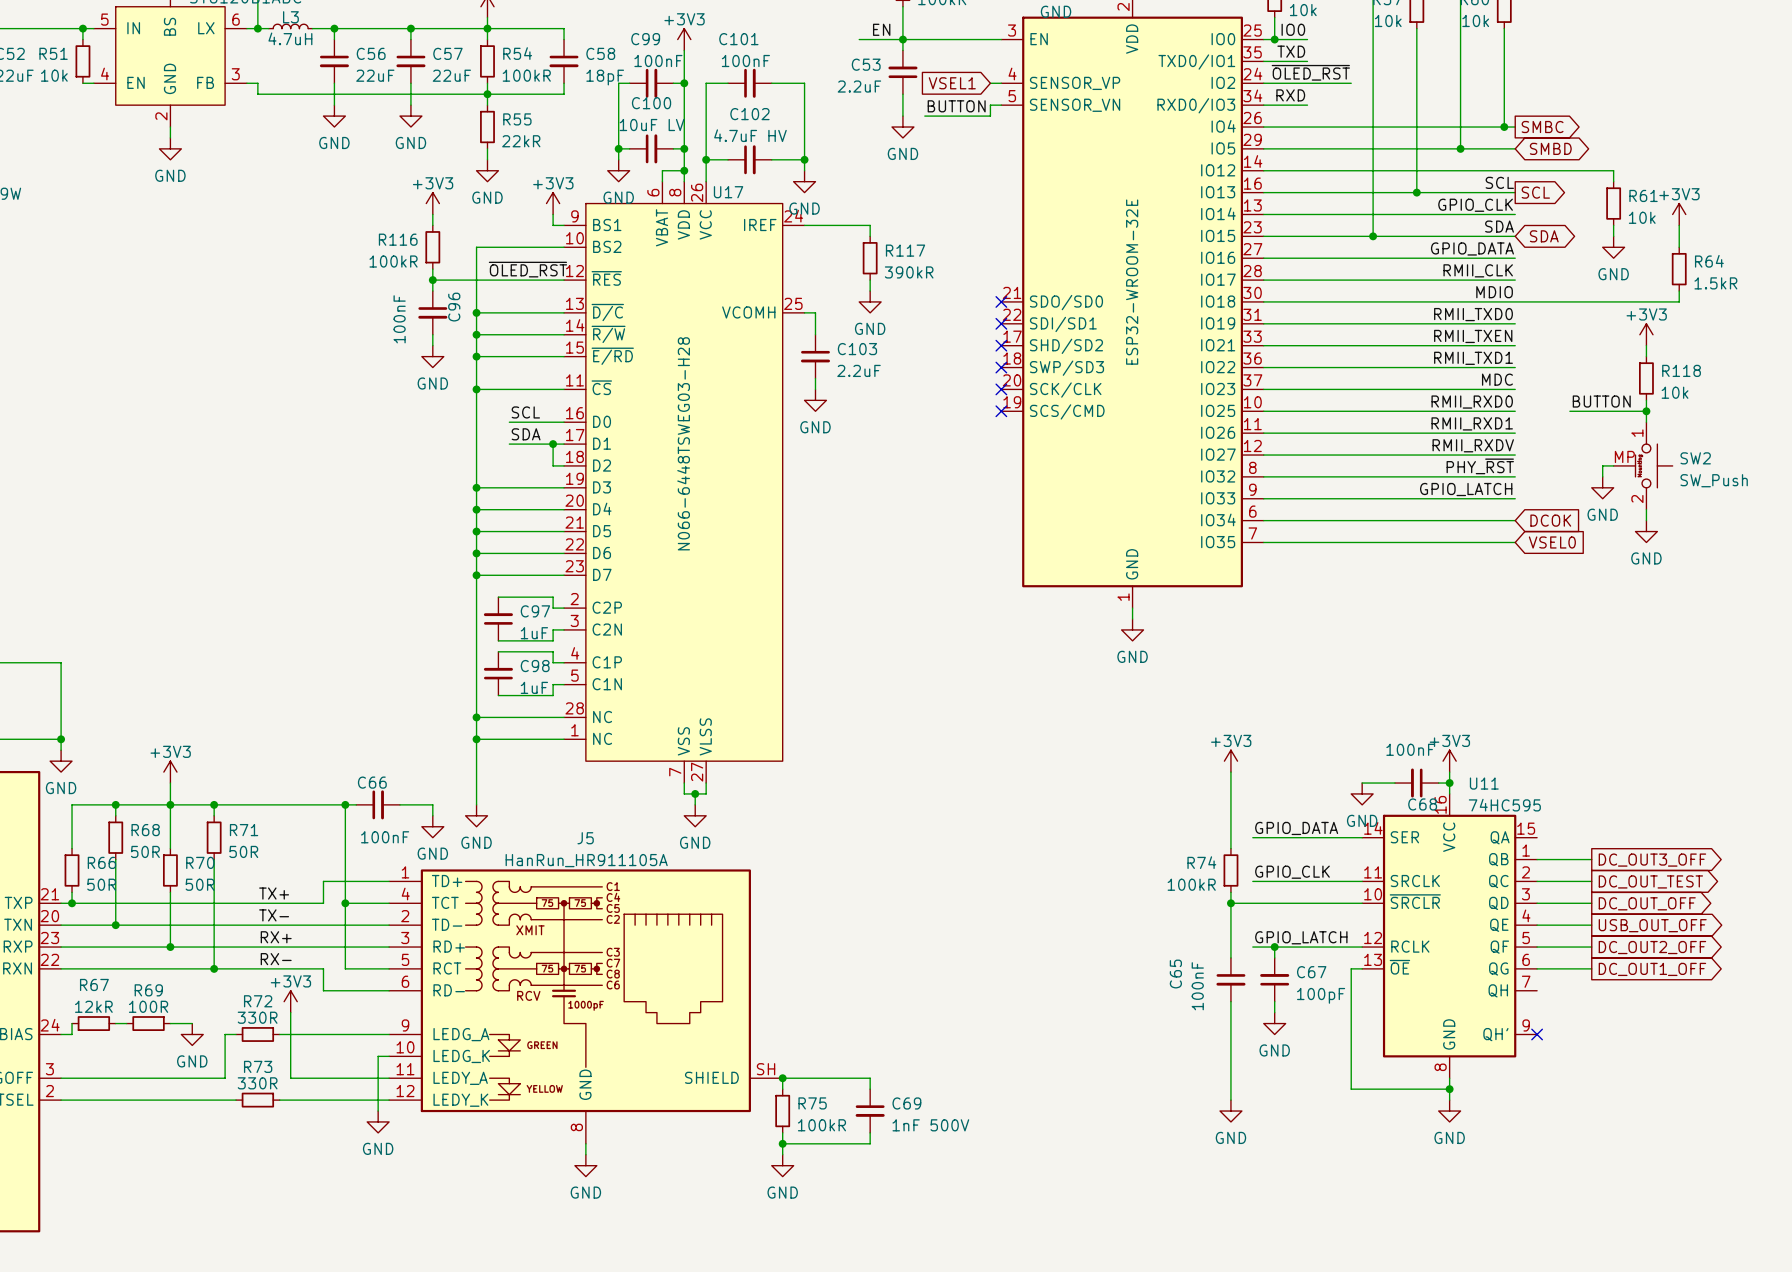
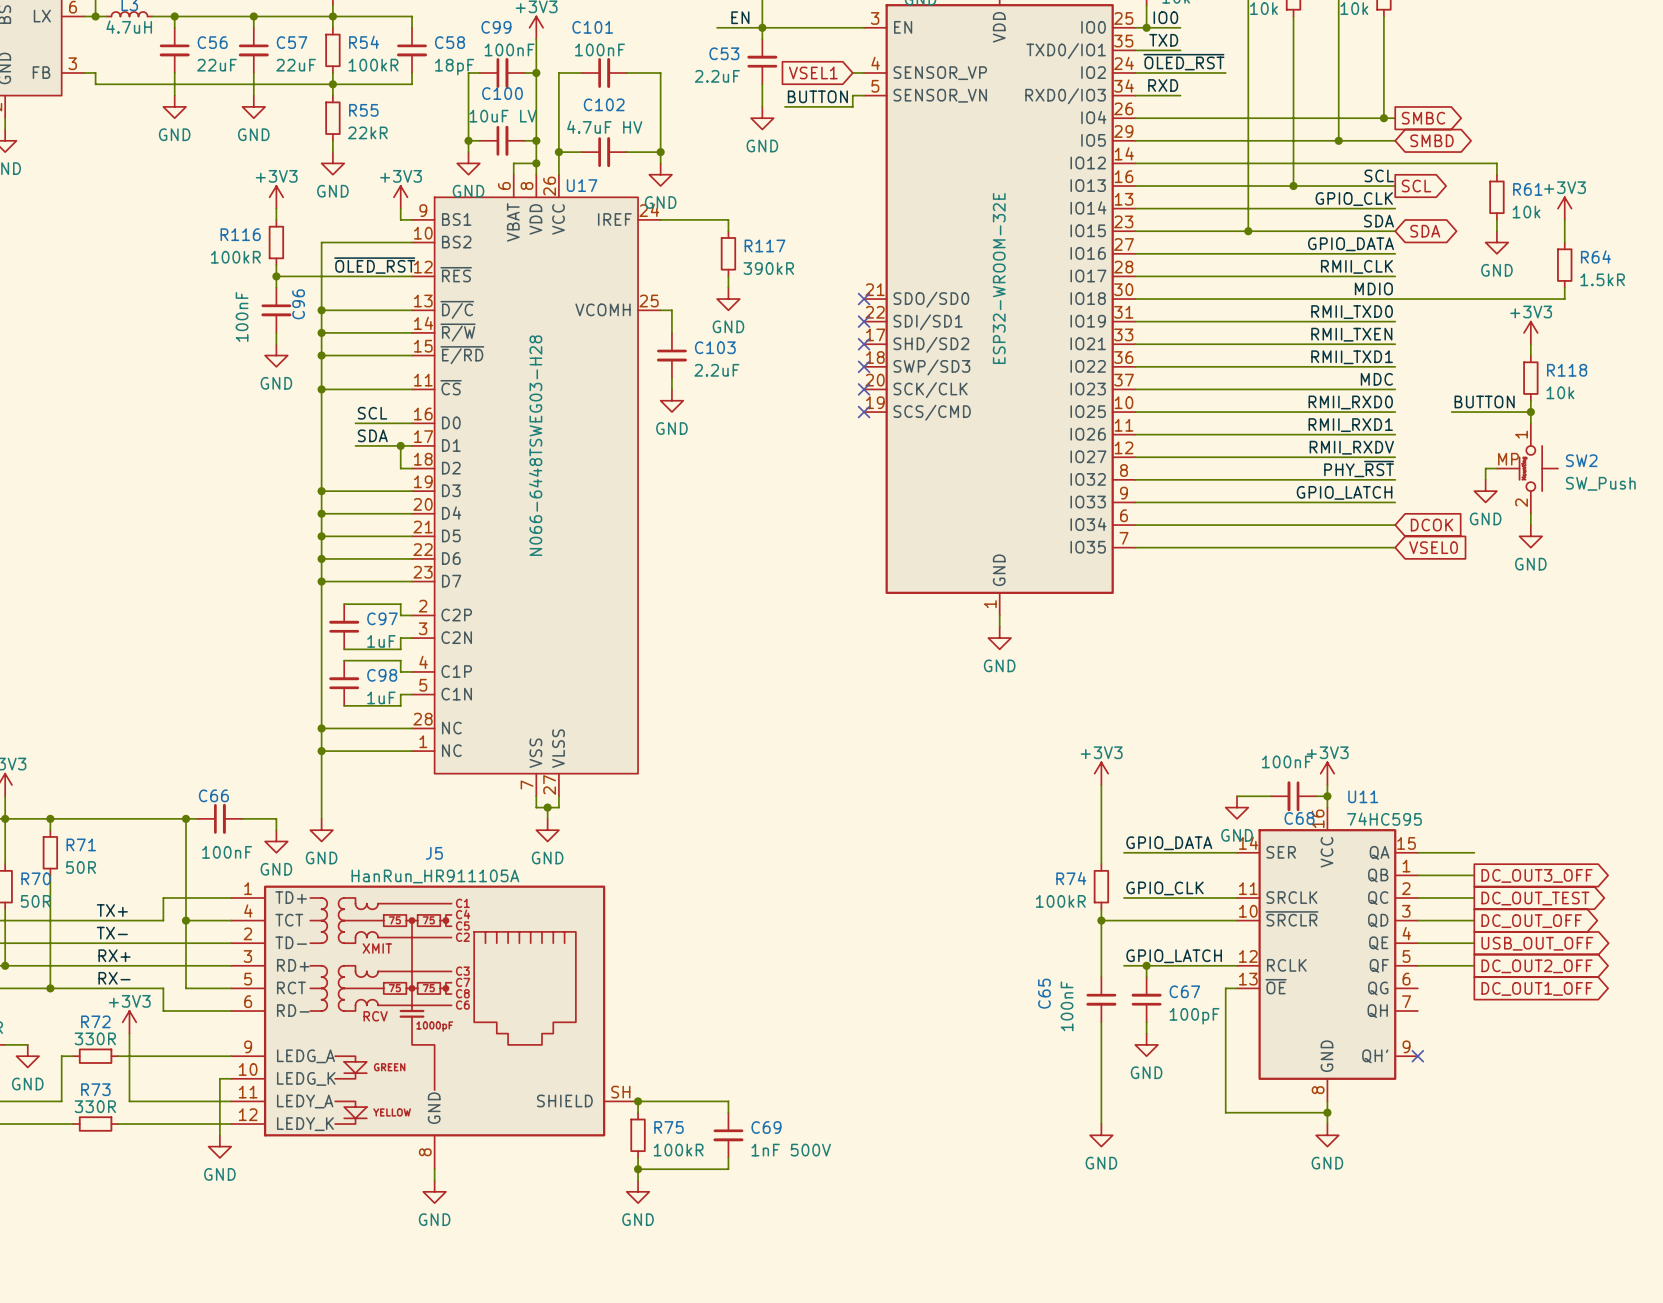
wire: (1537, 968) (1591, 968) -> (1417, 852) (1474, 852)

